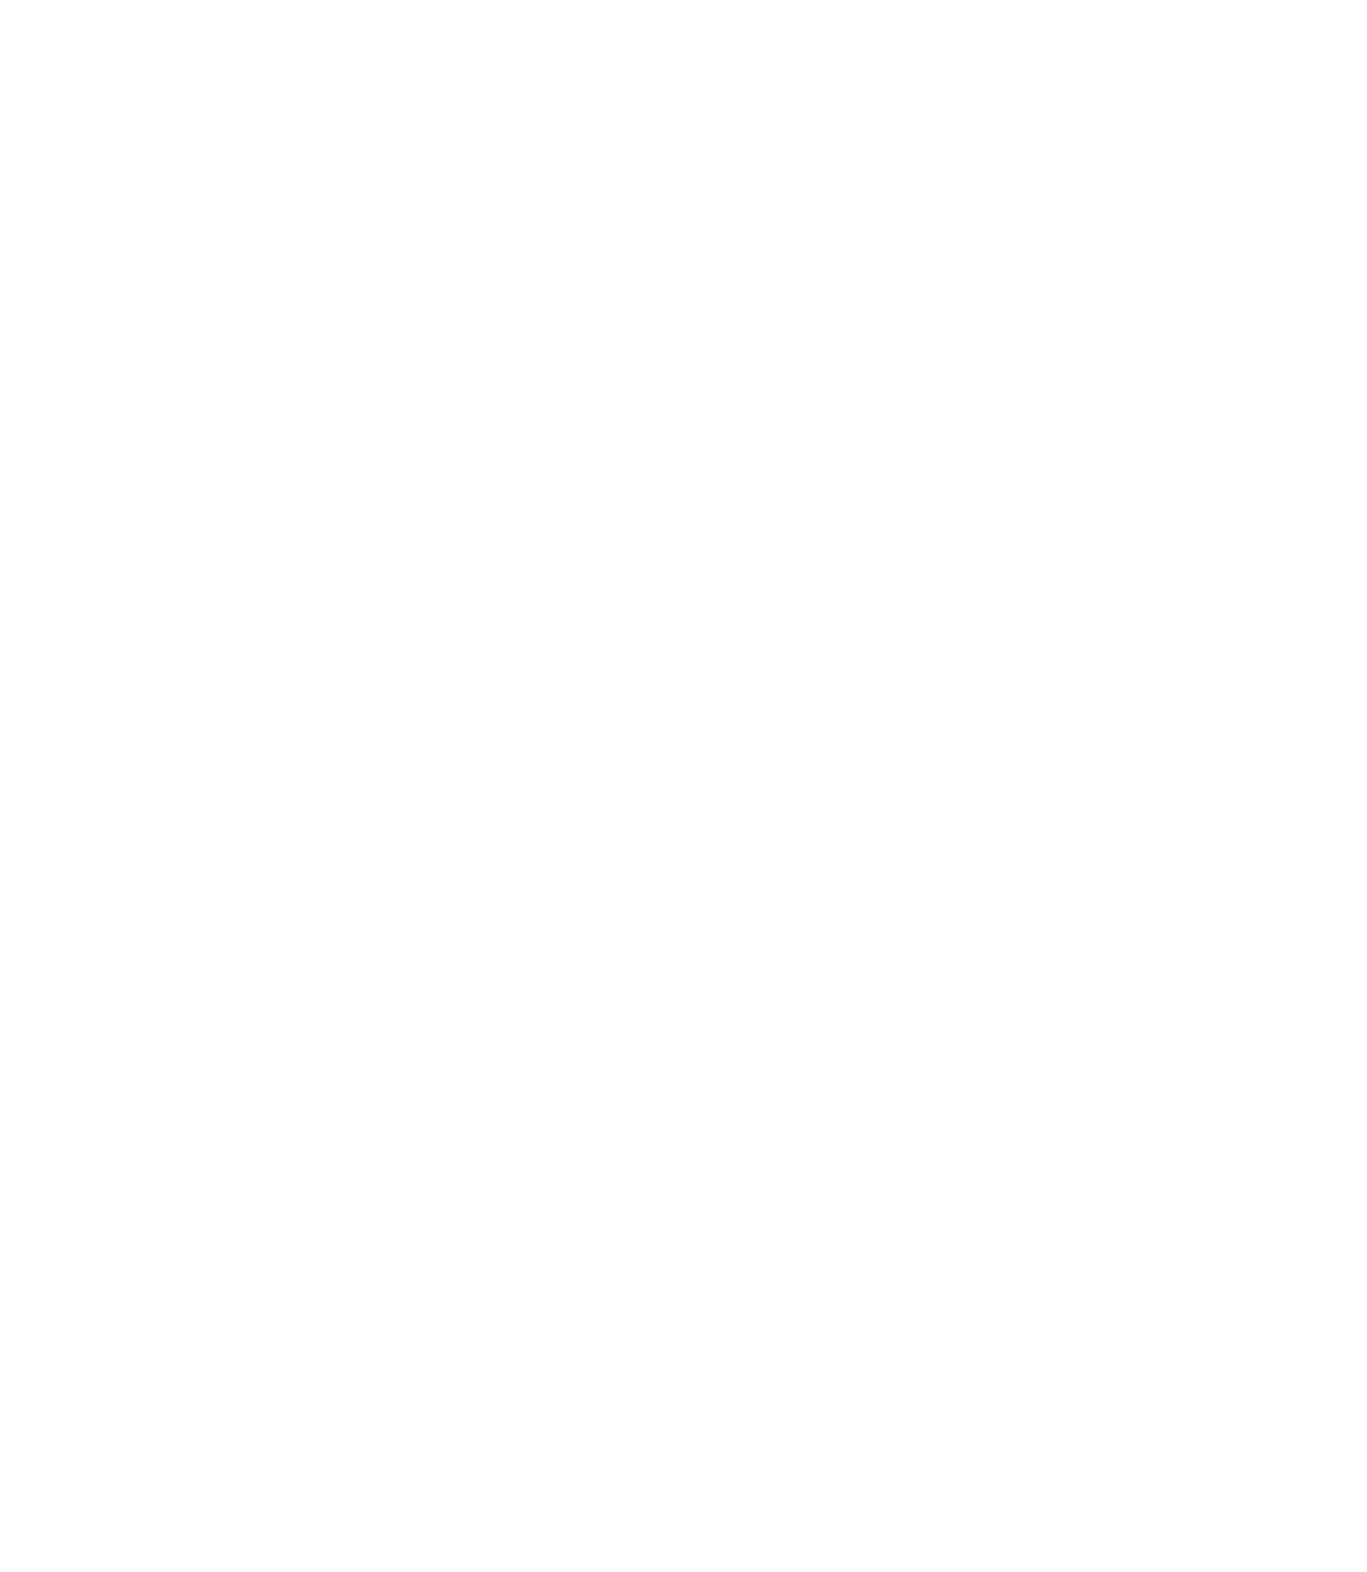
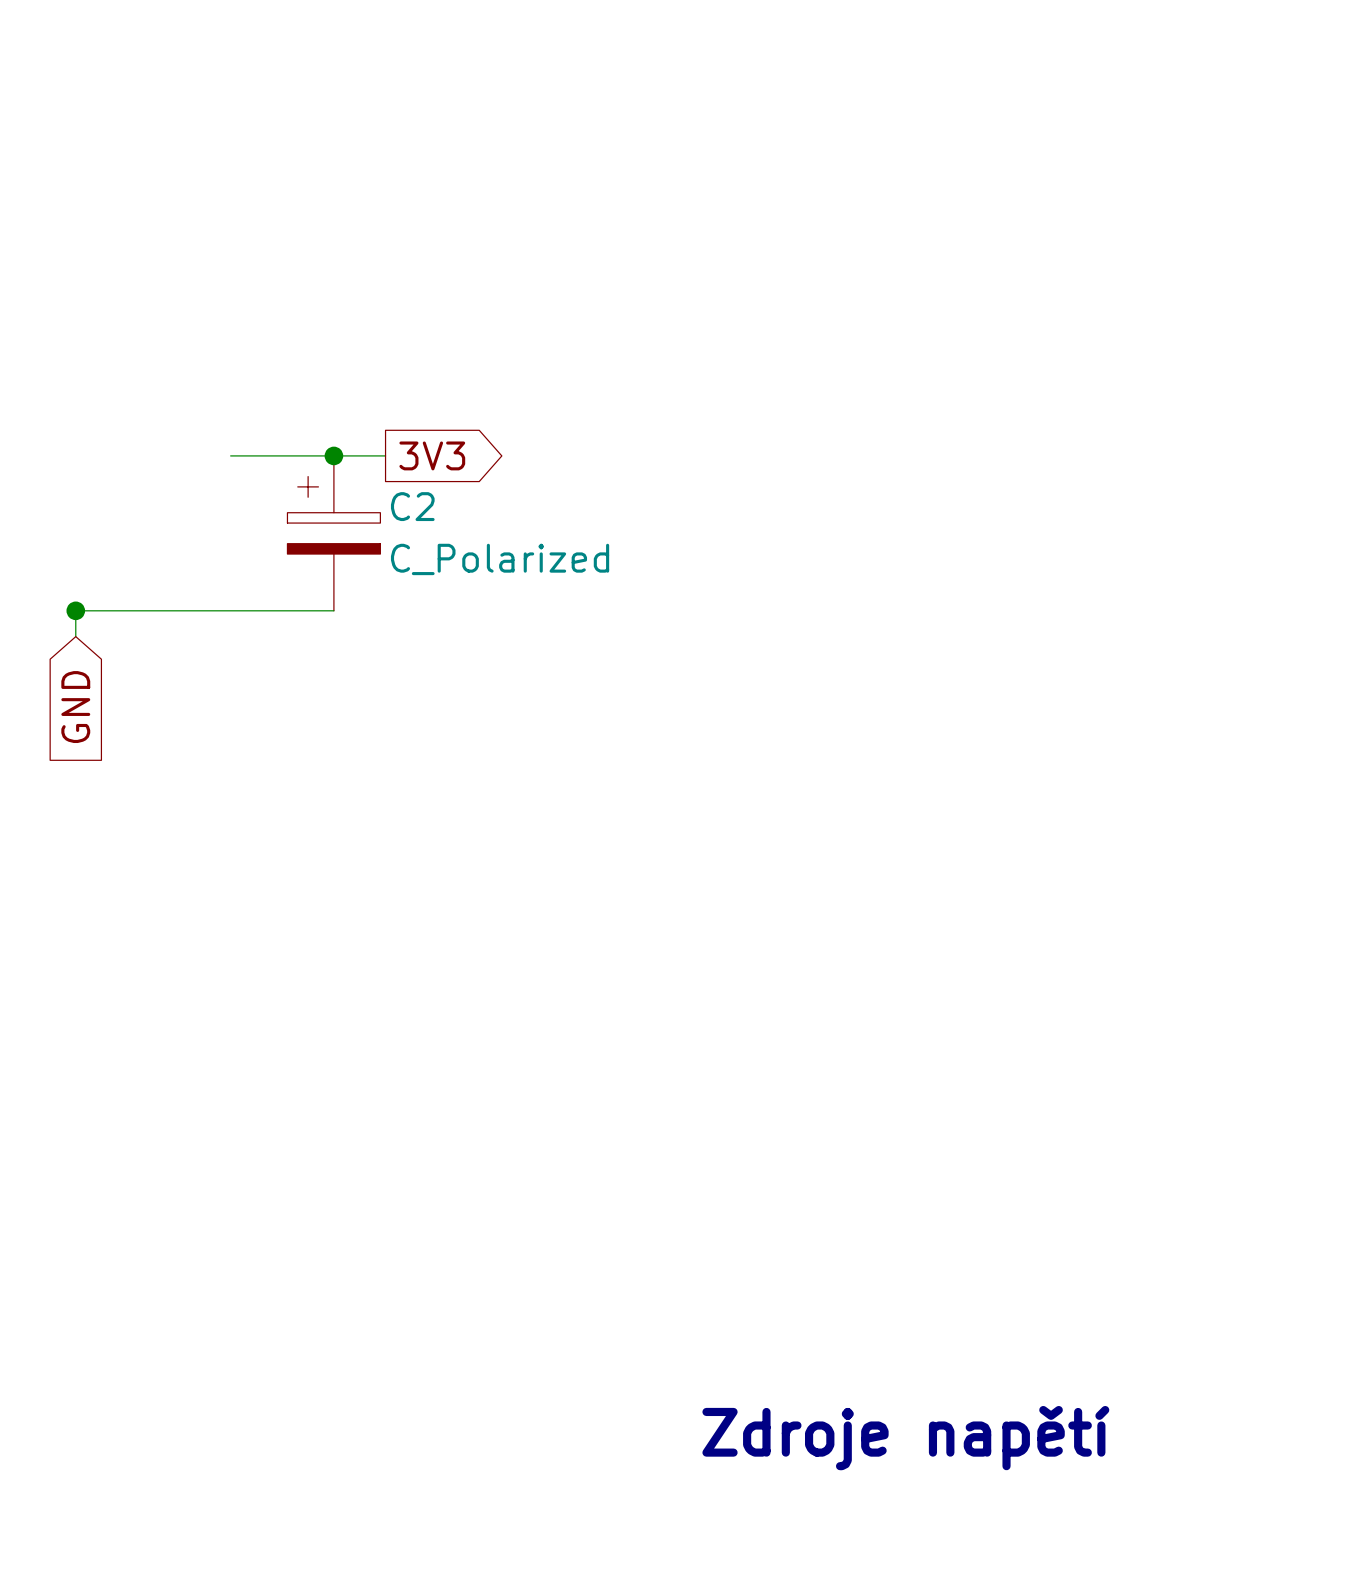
wire: none -> (230, 455) (385, 455)
junction: none -> (333, 455)
global label: none -> 3V3 (432, 455)
C2: none -> C_Polarized (333, 533)
junction: none -> (75, 610)
wire: none -> (333, 610) (75, 610) (75, 636)
global label: none -> GND (75, 707)
text: none -> Zdroje napětí (905, 1438)

